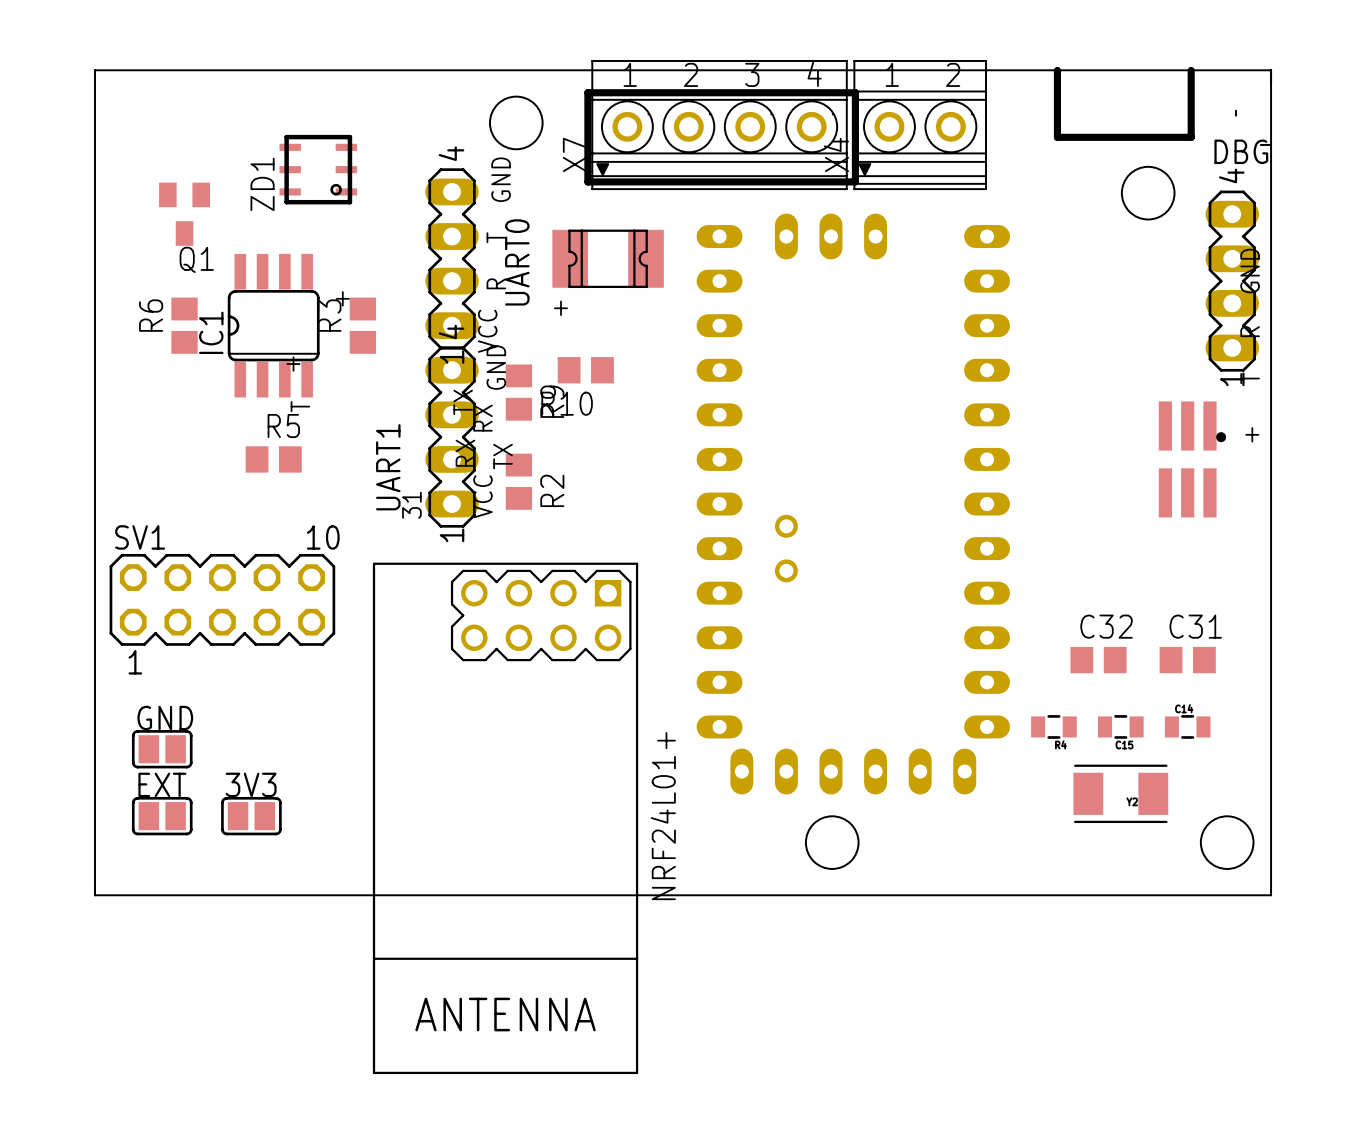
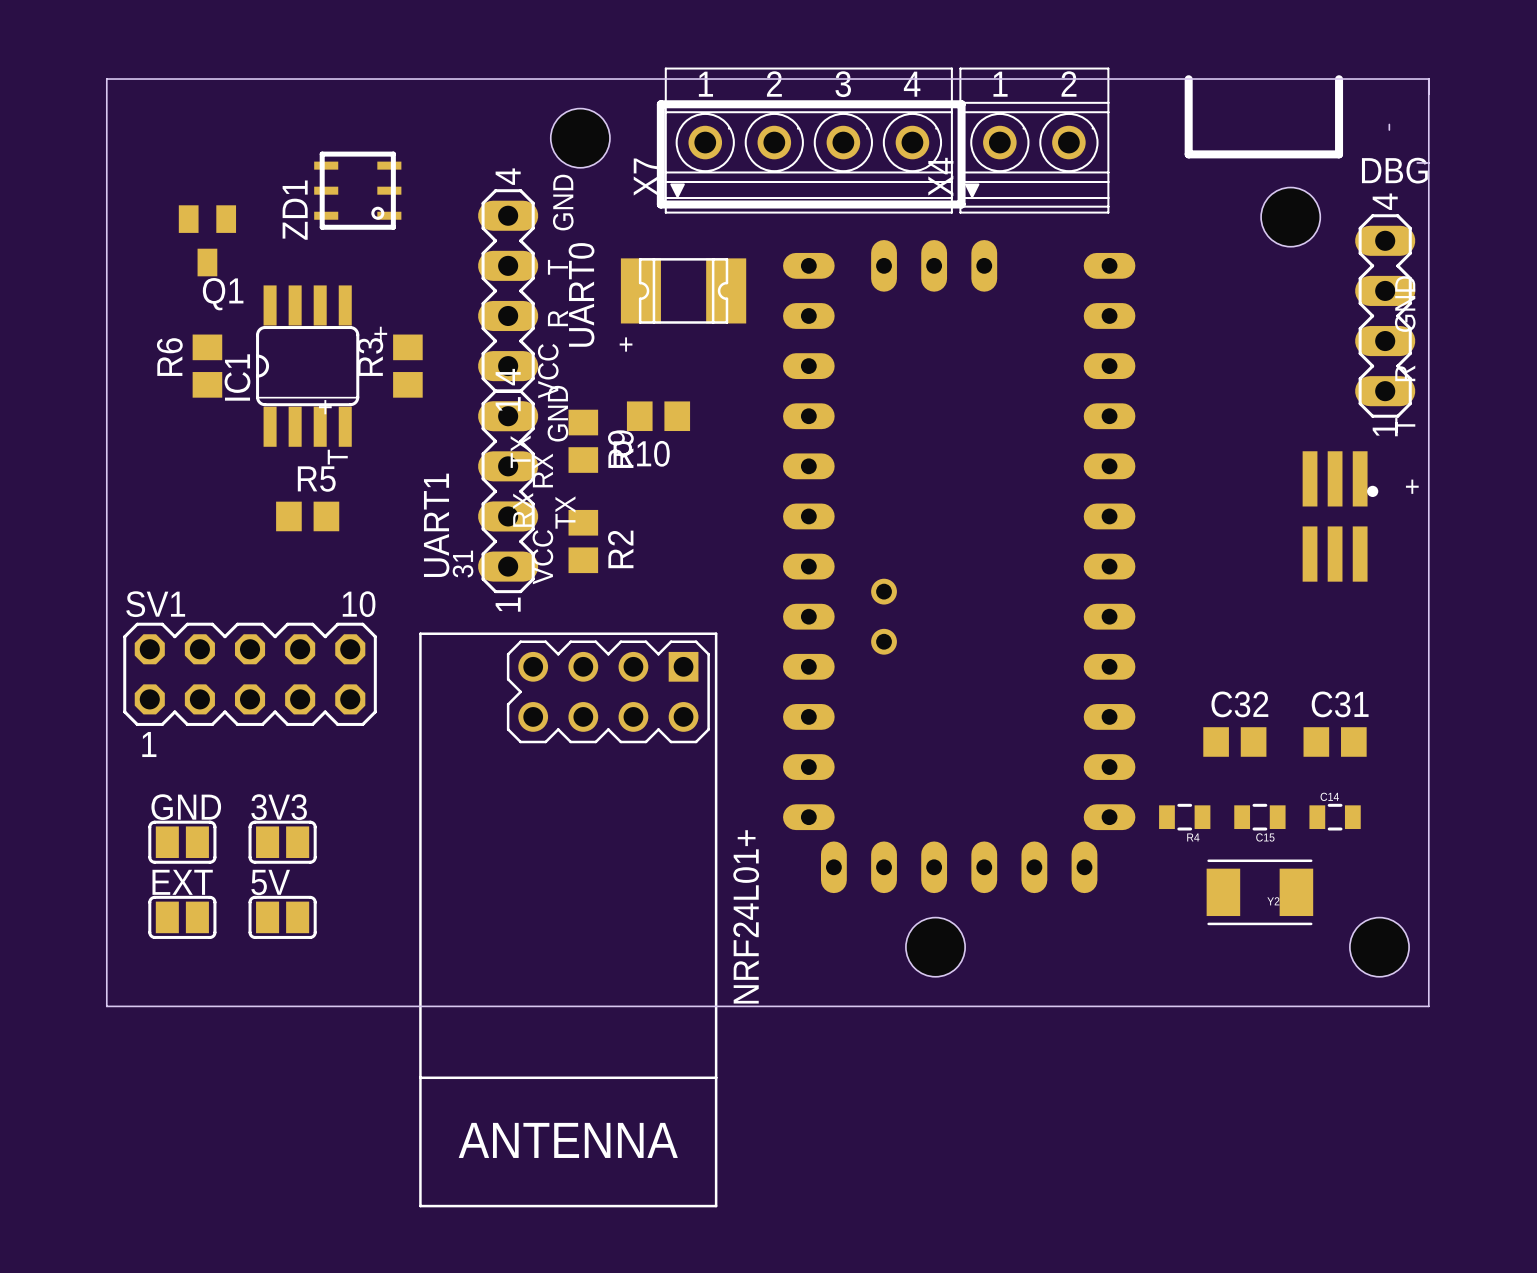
3V3: none -> (282, 842)
3V3 name: 3V3 (251, 784) -> 5V (270, 882)

